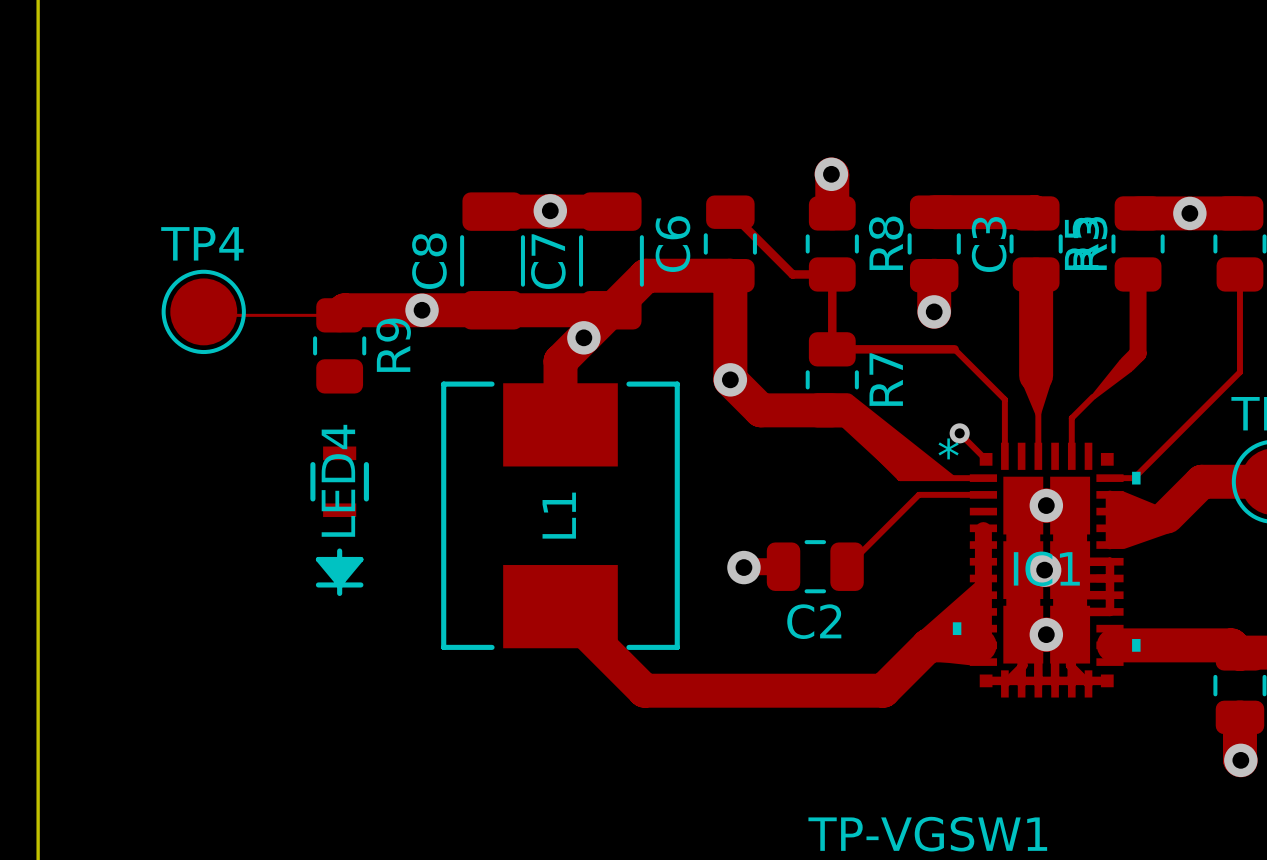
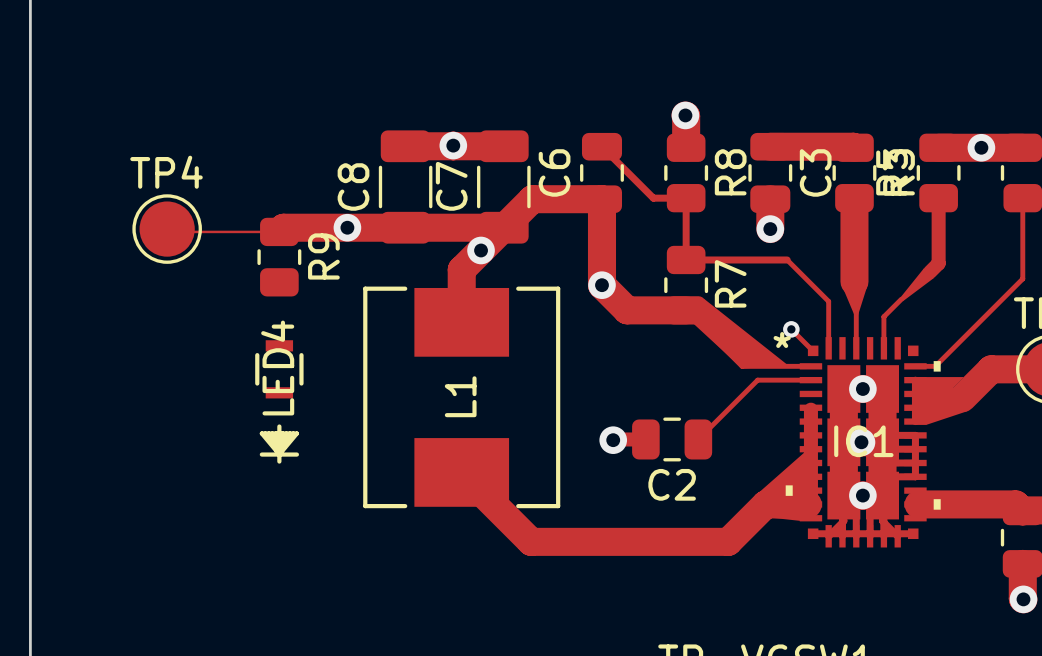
drawing shape: [1110, 491, 1173, 549] -> [914, 377, 969, 425]

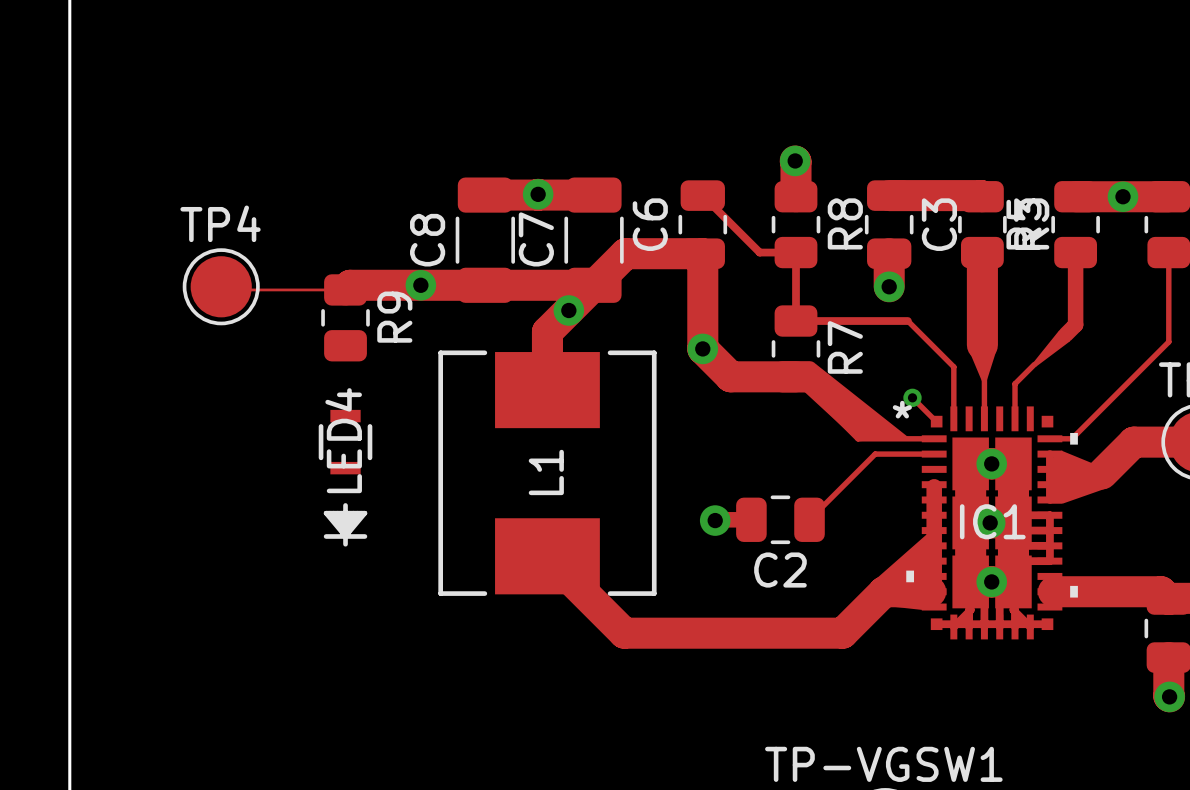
drawing shape: [914, 377, 969, 425] -> [1049, 450, 1108, 504]

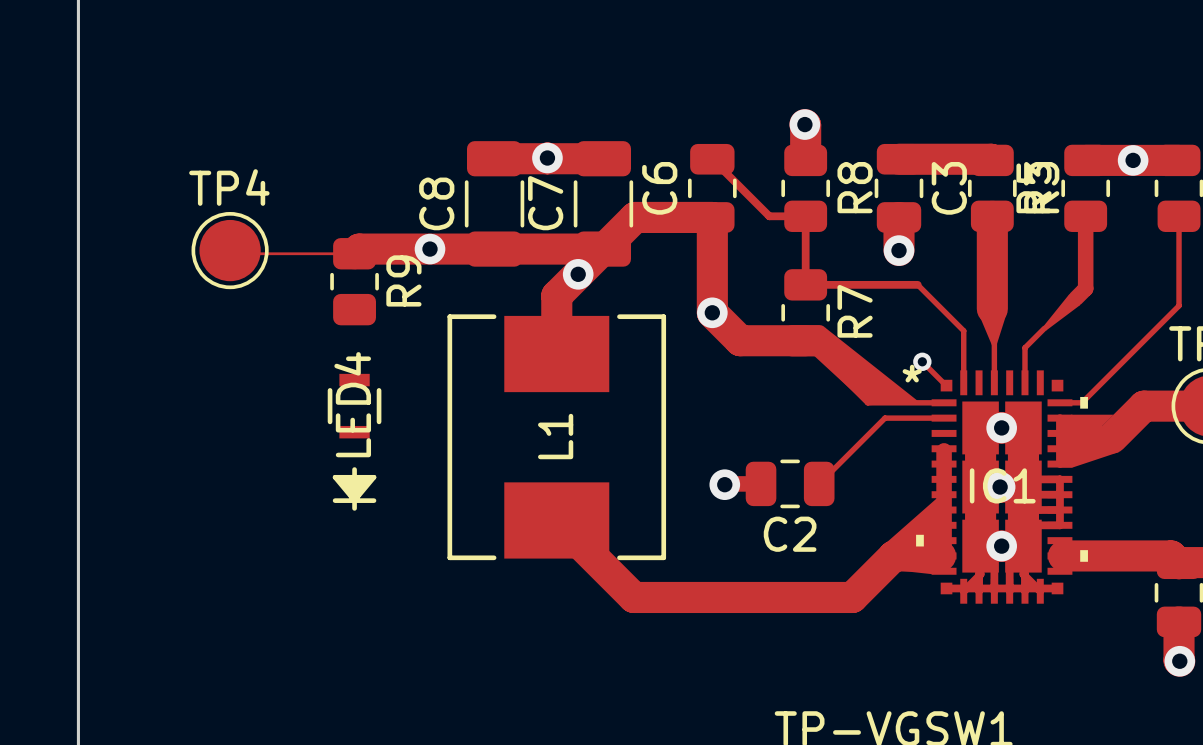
drawing shape: [1049, 450, 1108, 504] -> [1059, 414, 1120, 468]

